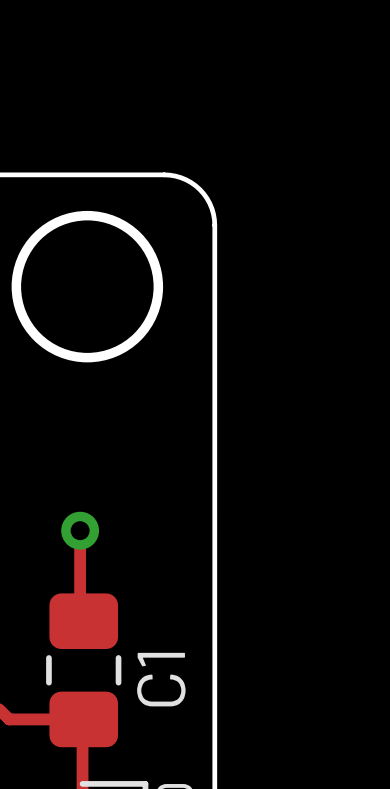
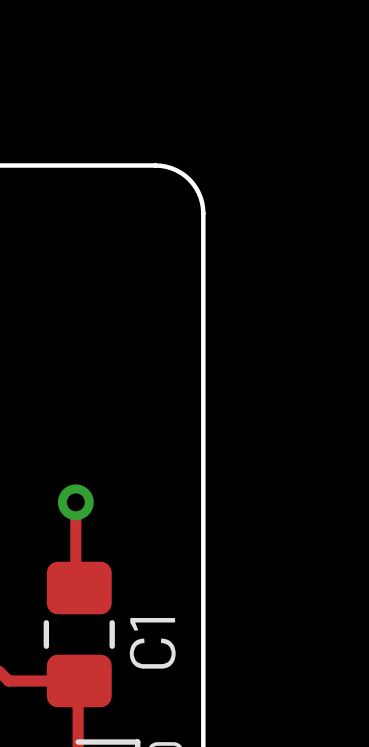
round board edge: [11, 210, 164, 363] -> none

